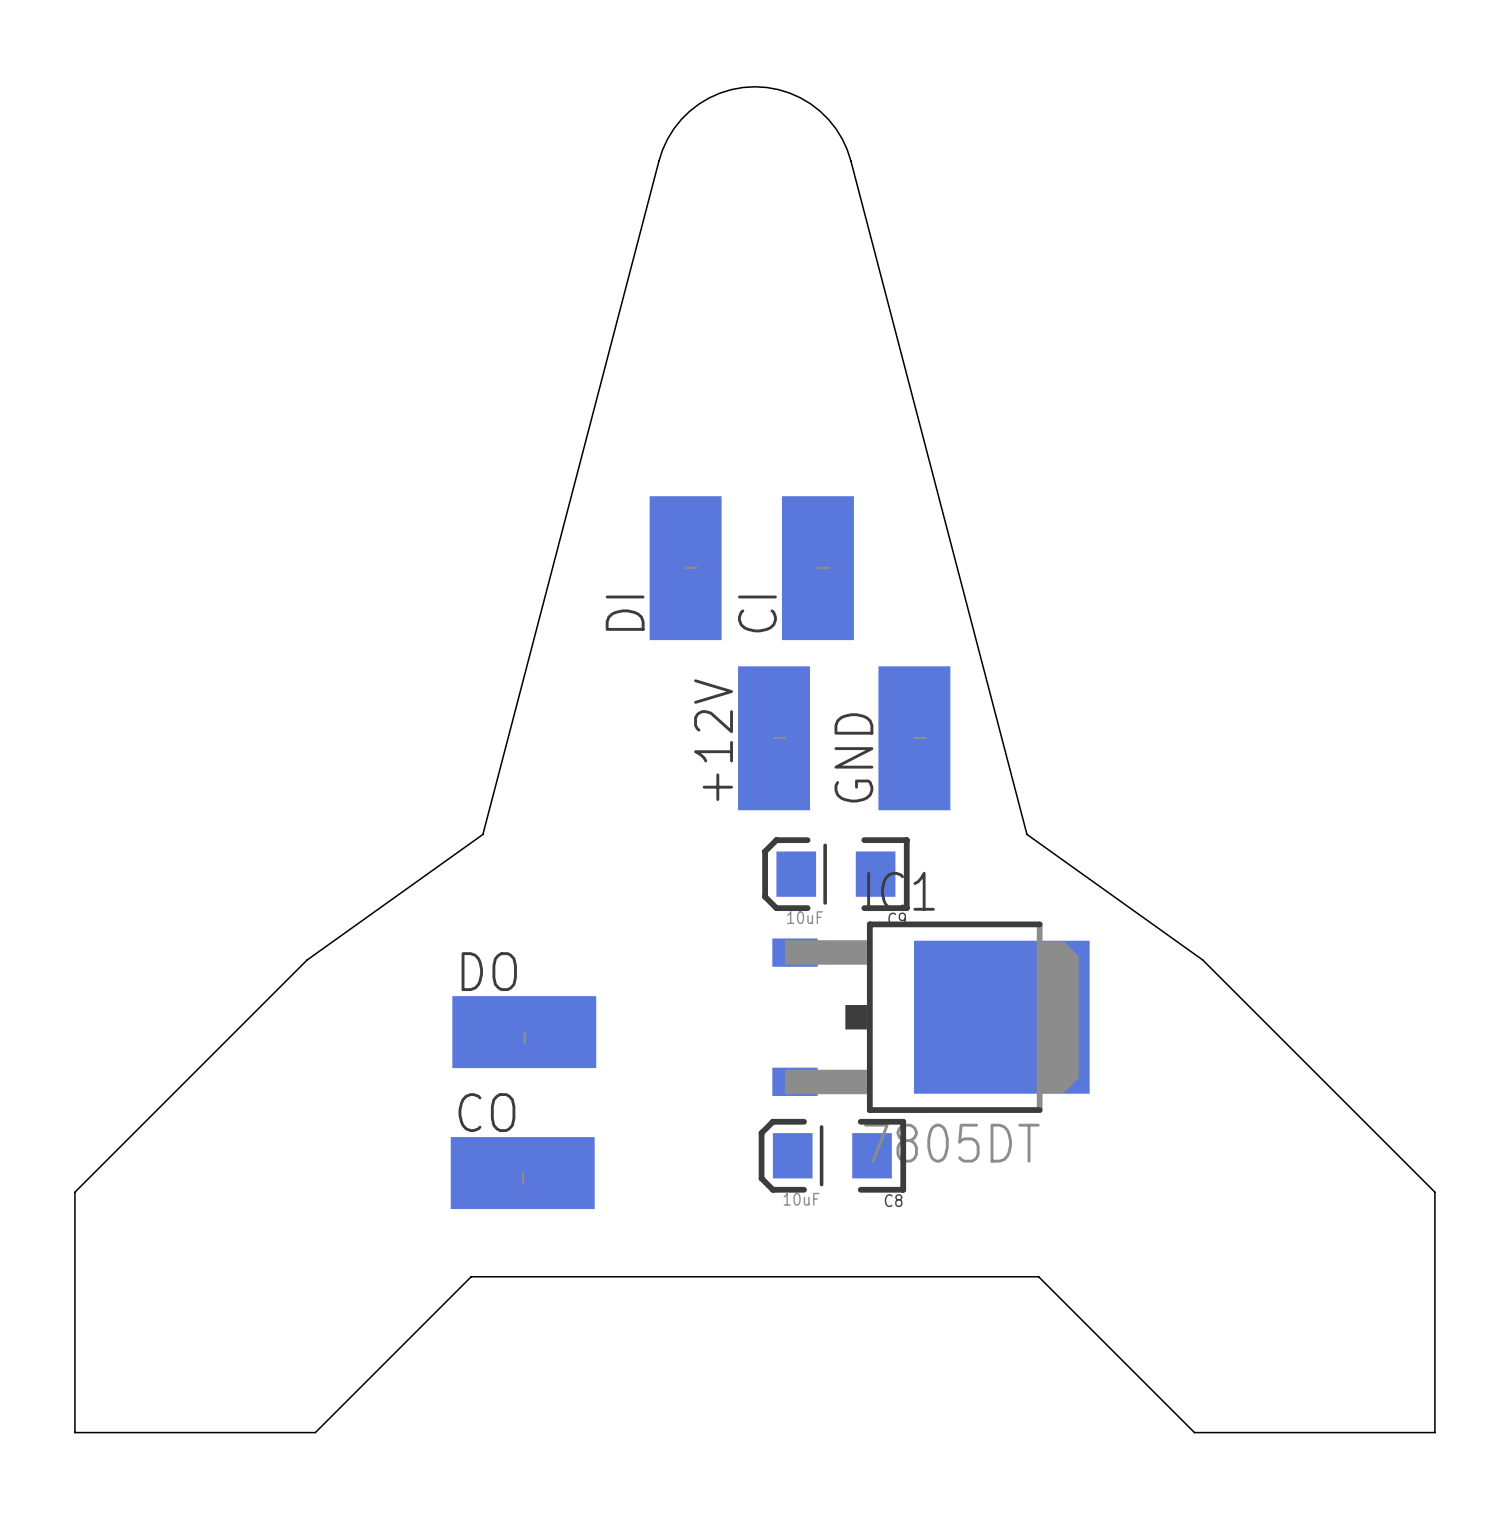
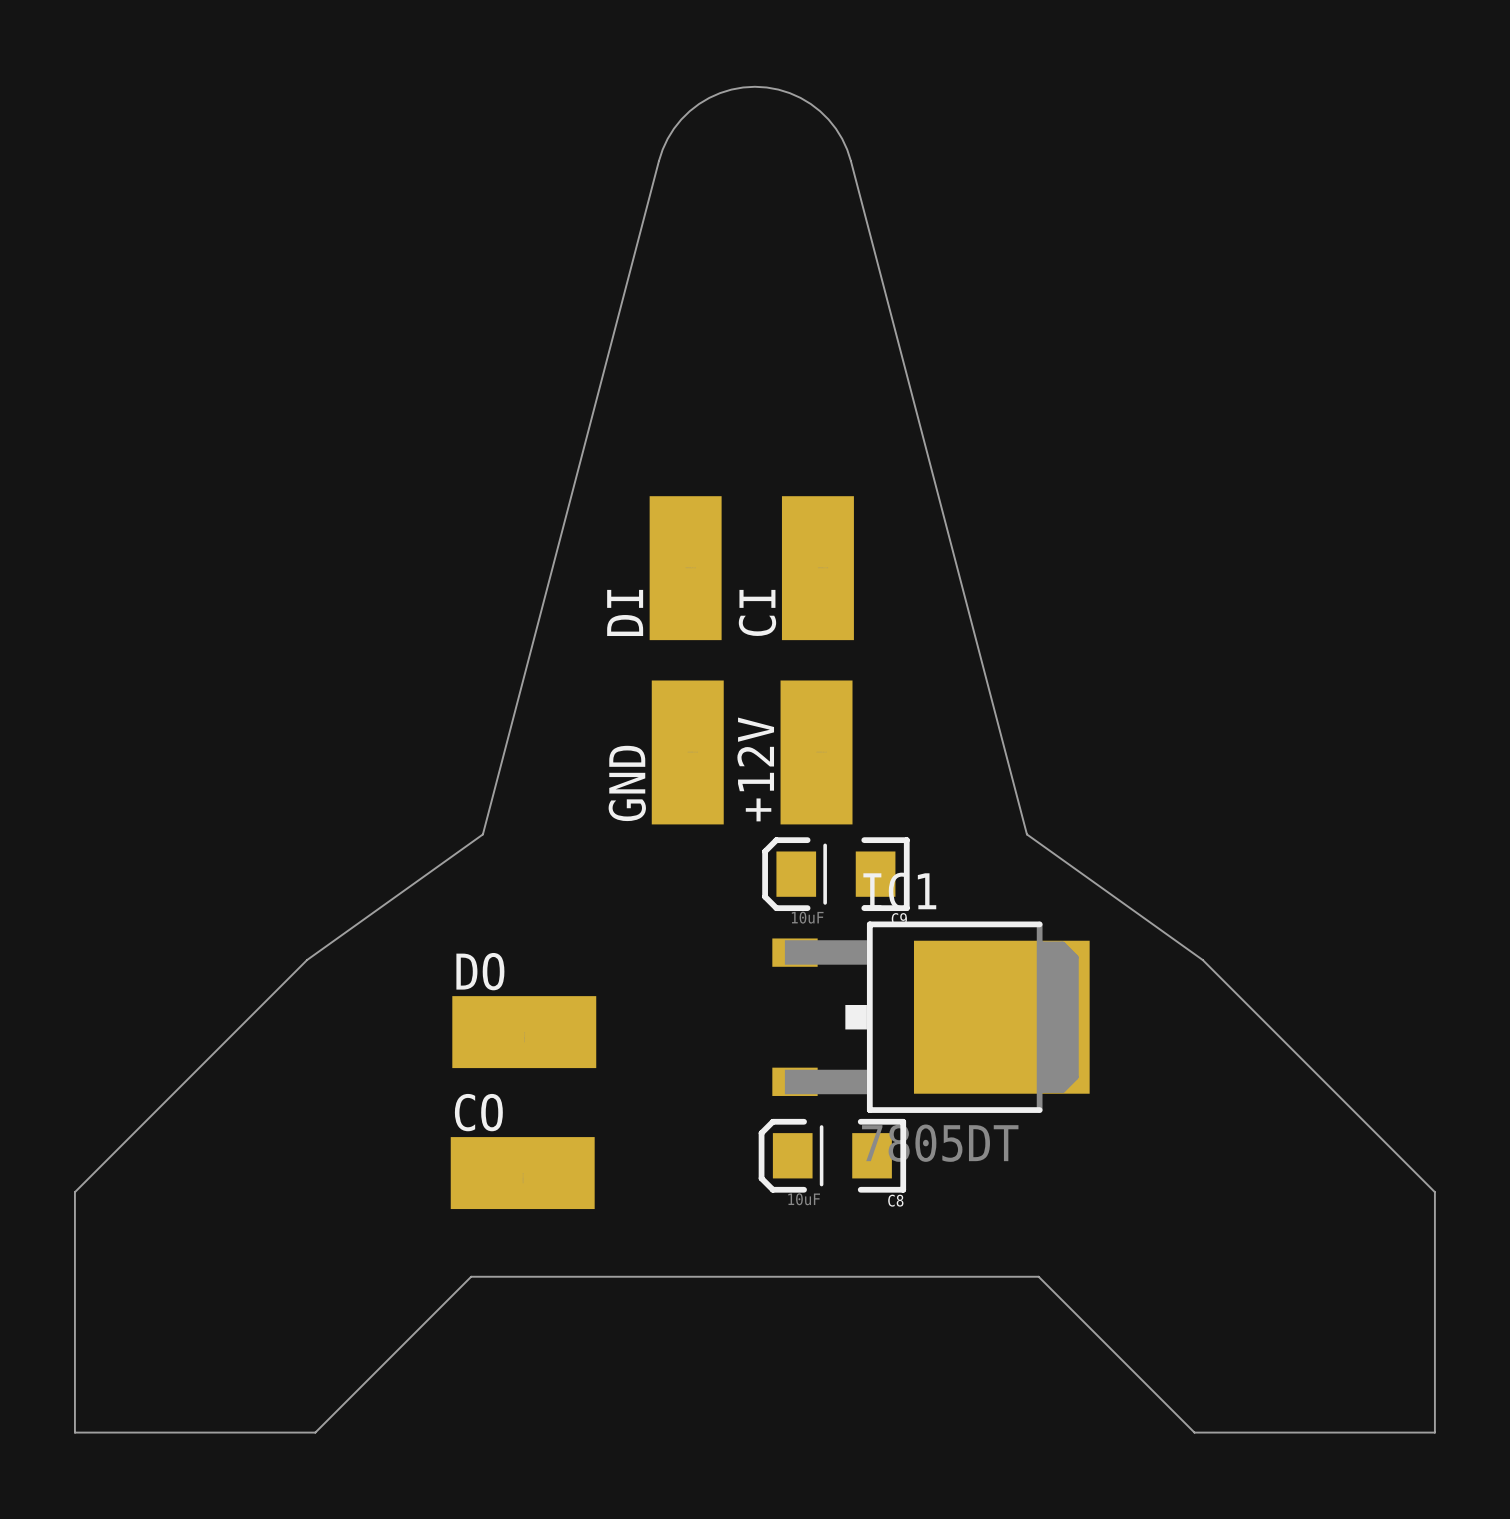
+12V position: (774, 738) -> (816, 752)
GND position: (914, 738) -> (687, 752)

